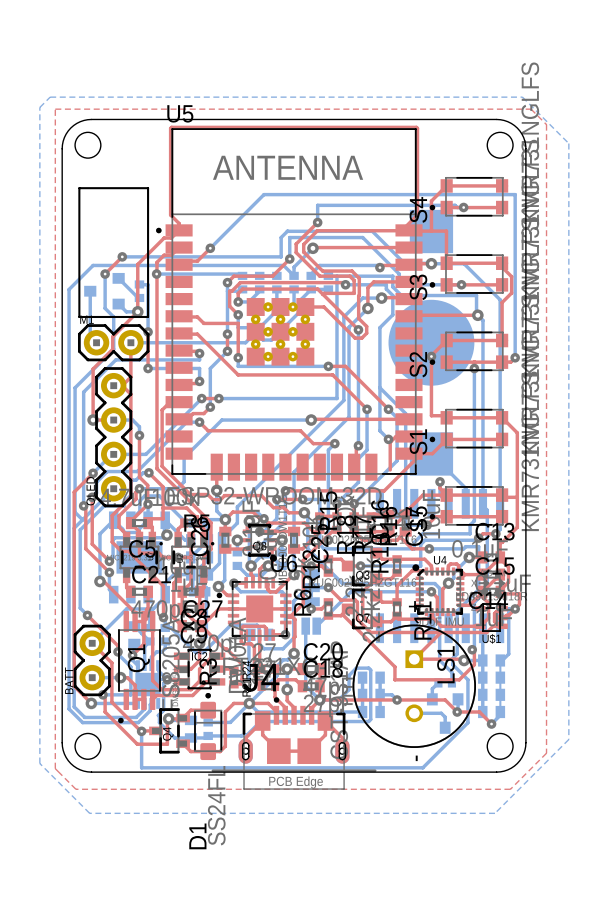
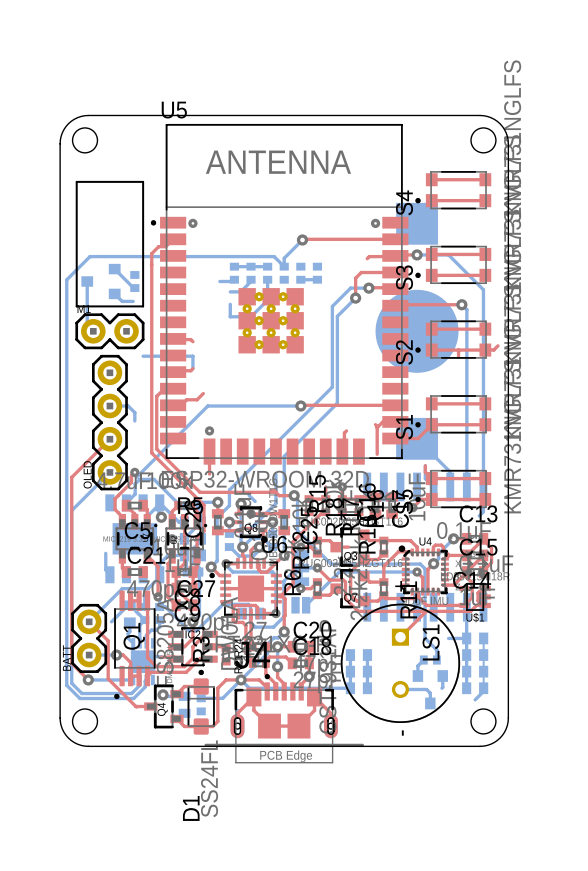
bottom zone outline: (50, 97) (522, 97) (568, 143) (568, 739) (495, 813) (89, 813) (39, 763) (39, 107) (50, 97) -> none
top zone outline: (55, 109) (531, 109) (546, 124) (546, 753) (510, 789) (75, 789) (55, 768) (55, 109) -> none
top track: (446, 186) (431, 201) (431, 231) -> none
bottom track: (463, 207) (457, 207) (455, 205) (317, 205) (317, 222) -> none
via: (463, 207) -> none
top track: (317, 222) (296, 243) (296, 252) (319, 276) (349, 276) (354, 280) (354, 293) (323, 294) -> none
via: (317, 222) -> none
top track: (409, 230) (446, 231) (446, 263) -> none
bottom track: (287, 231) (281, 237) (281, 256) (122, 256) -> none
bottom track: (287, 231) (372, 231) (404, 263) (431, 263) -> none
via: none -> (375, 223)
top track: (210, 248) (197, 261) (182, 261) (179, 264) -> none
bottom track: (210, 248) (263, 194) (515, 194) (515, 357) -> none
via position: (210, 248) -> (192, 223)
top track: (122, 256) (105, 274) -> none
via: (122, 256) -> none
top track: (289, 259) (272, 276) (233, 276) (227, 282) -> none
bottom track: (289, 259) (289, 237) (362, 237) (399, 274) (399, 284) (461, 284) -> none
via: (289, 259) -> none
top track: (502, 263) (502, 267) (511, 276) (511, 293) (502, 302) (502, 340) -> none
bottom track: (379, 267) (379, 265) (319, 265) (311, 275) -> none
via: (379, 267) -> none
bottom track: (105, 274) (105, 308) (113, 316) (113, 349) (75, 387) (75, 512) (82, 519) -> none
via: (105, 274) -> none
bottom track: (156, 274) (242, 274) (242, 275) -> none
via: (156, 274) -> none
bottom track: (328, 275) (392, 276) (392, 286) (401, 295) (476, 295) (477, 315) -> none
bottom track: (336, 276) (336, 398) (218, 398) -> none
bottom track: (227, 282) (227, 334) -> none
via: (227, 282) -> none
bottom track: (139, 284) (148, 284) (148, 332) -> none
top track: (345, 284) (343, 282) (240, 282) (229, 291) (229, 306) (238, 314) -> none
bottom track: (345, 284) (386, 284) (386, 289) (392, 295) (392, 314) (379, 327) (379, 430) (388, 439) -> none
via: (345, 284) -> none
via: (461, 284) -> none
bottom track: (294, 289) (292, 307) -> none
bottom track: (311, 289) (301, 299) (301, 310) (271, 340) (263, 340) (259, 336) (252, 336) (245, 342) (130, 342) -> none
top track: (238, 301) (238, 293) (242, 289) (317, 289) (358, 329) -> none
via: (238, 301) -> none
top track: (255, 307) (323, 307) (355, 338) (361, 338) (366, 333) (366, 326) (358, 318) (359, 278) (352, 271) (322, 271) (303, 252) (303, 244) (317, 230) (401, 230) (417, 215) (416, 127) (171, 127) (170, 215) (179, 223) (179, 230) (171, 238) (164, 238) (137, 264) (137, 311) (112, 336) (112, 349) (93, 369) (93, 420) (113, 420) -> none
via: (137, 311) -> none
via: (238, 314) -> none
top track: (179, 316) (197, 316) (203, 323) (238, 323) (238, 357) -> none
bottom track: (358, 329) (358, 445) -> none
via: (358, 329) -> none
top track: (148, 332) (148, 368) -> none
via: (148, 332) -> none
top track: (179, 333) (197, 334) (238, 374) (332, 374) (367, 409) -> none
top track: (227, 334) (227, 351) -> none
via: (227, 334) -> none
top track: (446, 340) (431, 355) (431, 415) (446, 415) (446, 417) -> none
top track: (130, 342) (130, 377) (122, 385) -> none
bottom track: (227, 351) (210, 368) (210, 407) -> none
via: (227, 351) -> none
bottom track: (199, 353) (199, 359) (115, 359) (83, 392) (83, 505) -> none
via: (199, 353) -> none
via: (431, 356) -> none
bottom track: (238, 357) (238, 366) (328, 366) -> none
via: (238, 357) -> none
via: (515, 357) -> none
top track: (328, 366) (345, 366) (388, 409) -> none
via: (328, 366) -> none
via: (148, 368) -> none
bottom track: (474, 368) (474, 520) (470, 525) (470, 533) (422, 533) (414, 542) (414, 548) (324, 548) (319, 544) (319, 499) (302, 499) -> none
via: (474, 368) -> none
via: (199, 381) -> none
top track: (122, 385) (130, 394) (130, 496) (112, 515) (112, 542) (121, 551) (128, 551) (152, 575) -> none
bottom track: (379, 387) (405, 413) (405, 525) (427, 525) -> none
top track: (201, 398) (218, 398) -> none
bottom track: (201, 398) (145, 454) (111, 454) (93, 473) -> none
via: (201, 398) -> none
via: (218, 398) -> none
via: (210, 407) -> none
bottom track: (367, 409) (367, 450) (358, 458) (358, 482) (336, 503) -> none
via: (367, 409) -> none
bottom track: (388, 409) (397, 417) (397, 460) (354, 503) -> none
via: (388, 409) -> none
top track: (502, 417) (517, 432) (517, 527) (500, 542) (500, 557) -> none
via: (93, 420) -> none
bottom track: (221, 420) (184, 457) (184, 481) (177, 488) (139, 488) -> (214, 406) (207, 406) (136, 477)
top track: (199, 422) (208, 430) (300, 430) (313, 443) (334, 443) -> none
bottom track: (199, 422) (186, 422) (137, 471) (107, 471) (96, 482) (96, 493) (92, 497) -> none
via: (199, 422) -> none
top track: (139, 435) (139, 477) (147, 485) (148, 504) (129, 523) (130, 523) -> none
via: (139, 435) -> none
via: (388, 439) -> none
bottom track: (334, 443) (328, 450) (328, 540) -> none
via: (334, 443) -> none
via: none -> (209, 430)
via: (358, 445) -> none
top track: (409, 453) (420, 454) (384, 490) (285, 490) -> none
top track: (162, 464) (191, 495) -> (156, 449) (199, 492) (275, 492)
top track: (148, 472) (163, 487) (163, 518) (150, 518) (148, 523) -> none
bottom track: (148, 472) (143, 472) (136, 480) (130, 481) (130, 495) (124, 501) (124, 505) (104, 505) (80, 529) (80, 608) (87, 615) -> none
via: (148, 472) -> none
top track: (93, 473) (74, 493) -> (109, 439) (71, 477)
via: (93, 473) -> none
via: (440, 481) -> none
bottom track: (216, 490) (216, 511) (225, 519) (225, 527) (219, 533) (219, 563) (208, 574) -> none
via: (216, 490) -> none
via: (285, 490) -> none
top track: (190, 494) (207, 494) (212, 499) (220, 499) (224, 495) (261, 495) (273, 507) (280, 507) -> none
top track: (446, 495) (422, 495) (388, 531) (371, 531) (371, 529) -> none
top track: (502, 495) (504, 497) (517, 497) -> none
top track: (92, 497) (92, 544) (109, 561) -> none
via: (92, 497) -> none
top track: (276, 499) (302, 499) -> none
bottom track: (276, 499) (276, 518) (266, 531) (259, 531) -> none
via: (276, 499) -> none
via: (302, 499) -> none
via: (336, 503) -> none
bottom track: (482, 503) (487, 510) (487, 589) (474, 602) (474, 647) (472, 649) -> none
bottom track: (148, 504) (148, 520) (137, 532) (124, 532) (113, 520) (99, 533) (99, 581) -> none
via: (148, 504) -> none
top track: (83, 505) (85, 505) (85, 548) (109, 572) -> none
via: (83, 505) -> none
top track: (163, 508) (186, 508) (197, 516) (197, 523) -> none
via: (263, 518) -> none
top track: (225, 519) (232, 512) (253, 512) (268, 523) (304, 523) (315, 533) (319, 529) (302, 548) (294, 548) -> none
bottom track: none -> (158, 504) (148, 515)
top track: (354, 529) (362, 540) (397, 540) (405, 531) -> none
top track: (495, 533) (482, 533) (478, 538) -> none
via: (495, 533) -> none
bottom track: (166, 535) (164, 537) (115, 537) (113, 539) (113, 557) (109, 561) -> none
top track: (400, 537) (412, 548) (429, 548) -> none
bottom track: (478, 538) (478, 540) (425, 540) (420, 544) (420, 566) (360, 566) -> none
via: (478, 538) -> none
top track: (139, 539) (139, 553) (158, 553) (163, 557) (191, 557) -> none
via: (328, 540) -> none
via: (259, 546) -> none
bottom track: (429, 548) (478, 546) (478, 589) (457, 611) (457, 654) (452, 658) (452, 664) (467, 679) (467, 722) (422, 767) (141, 767) (141, 731) -> none
via: (429, 548) -> none
via: (109, 561) -> none
via: (360, 566) -> none
via: (109, 572) -> none
top track: (99, 581) (103, 581) (135, 612) (135, 621) -> none
via: (99, 581) -> none
top track: (148, 591) (148, 608) (146, 618) (143, 621) (143, 644) (132, 655) -> none
top track: (500, 591) (502, 593) (519, 593) (519, 604) (508, 615) (502, 617) -> none
top track: (233, 608) (218, 608) (201, 626) (242, 664) (242, 679) (246, 684) (233, 684) -> none
bottom track: (515, 608) (508, 608) (508, 654) (500, 660) -> none
via: (515, 608) -> none
top track: (342, 614) (394, 666) (394, 679) (459, 679) (474, 664) (474, 649) (472, 649) -> none
top track: (87, 615) (118, 645) (118, 651) -> none
via: (87, 615) -> none
bottom track: (305, 626) (305, 685) (319, 699) (338, 699) (349, 689) (349, 675) (356, 668) (368, 668) (370, 670) (370, 719) (368, 721) (260, 721) (246, 735) -> none
bottom track: none -> (126, 607) (111, 621)
bottom track: (250, 634) (248, 634) (248, 681) (246, 684) -> none
via: (472, 649) -> none
bottom track: (118, 651) (130, 666) (130, 694) (102, 694) -> none
via: (118, 651) -> none
via: (132, 655) -> none
top track: (414, 659) (464, 660) -> none
via: (464, 660) -> none
bottom track: (158, 665) (158, 671) (167, 679) (163, 683) (163, 710) (158, 715) (159, 722) (174, 737) (244, 735) -> none
via: (167, 679) -> none
top track: (102, 694) (105, 694) (105, 712) (137, 744) (167, 744) (167, 720) (183, 718) (182, 716) (183, 718) -> none
via: (102, 694) -> none
bottom track: (380, 694) (391, 694) (397, 699) -> none
top track: (319, 699) (445, 699) (457, 712) (479, 712) (491, 724) -> none
via: (397, 699) -> none
via: (457, 712) -> none
via: (491, 724) -> none
via: (141, 731) -> none

